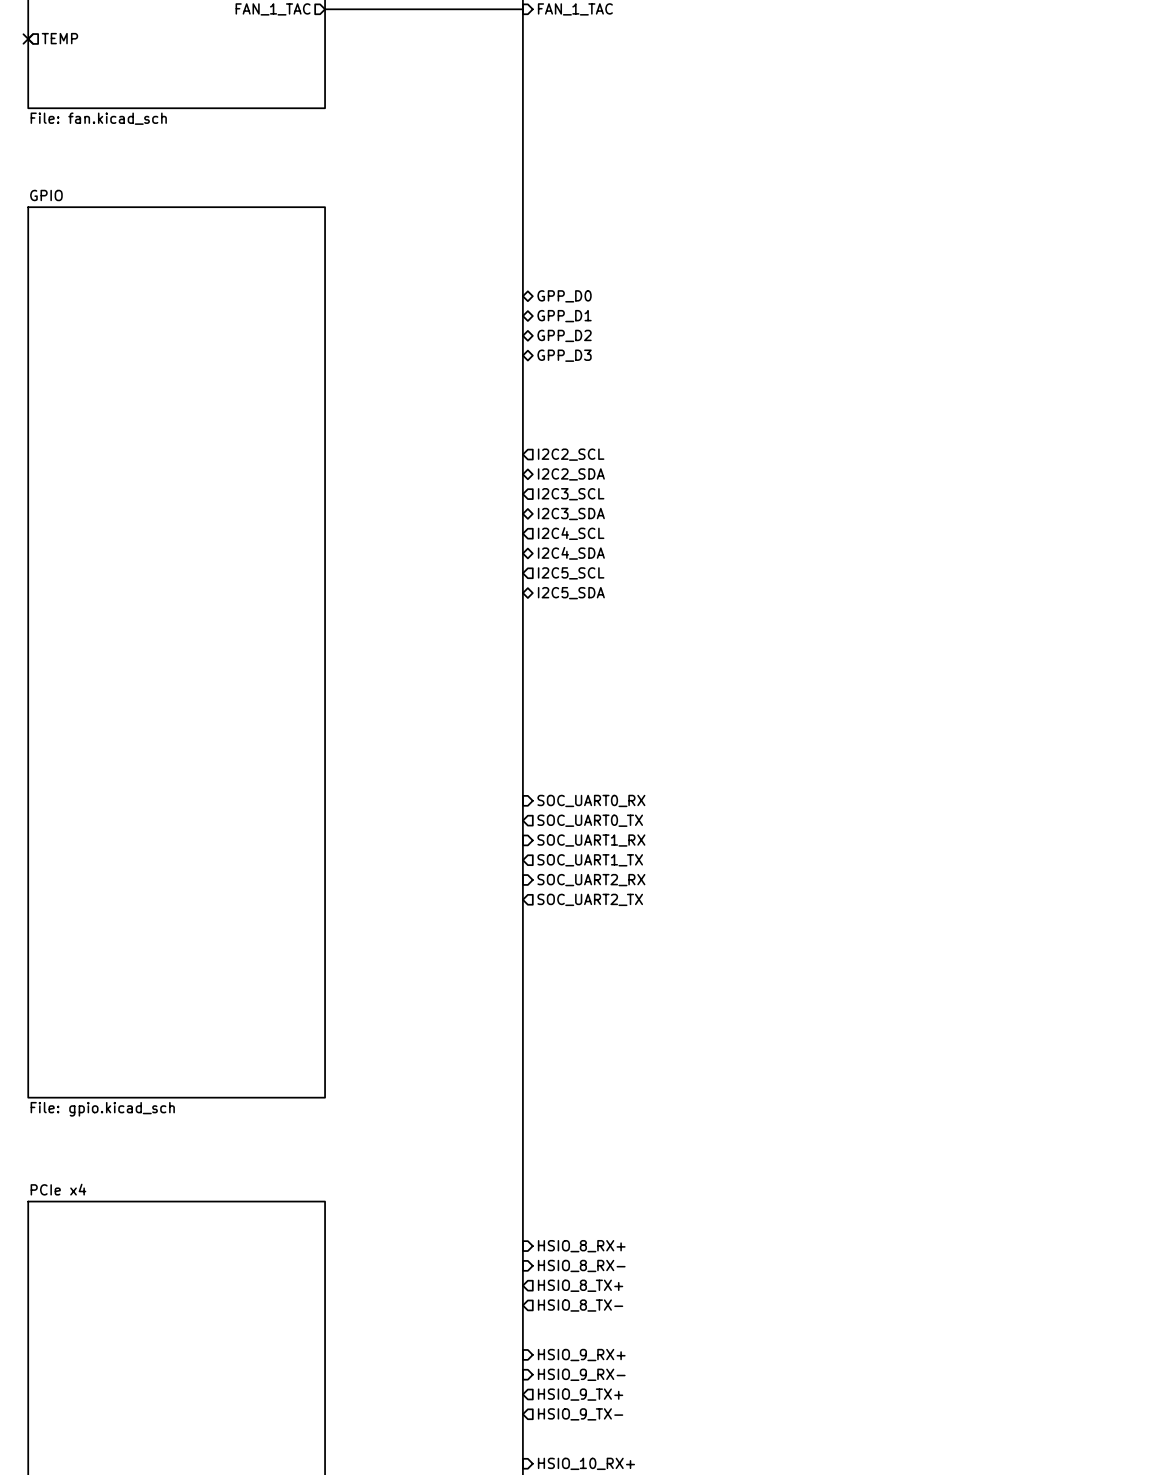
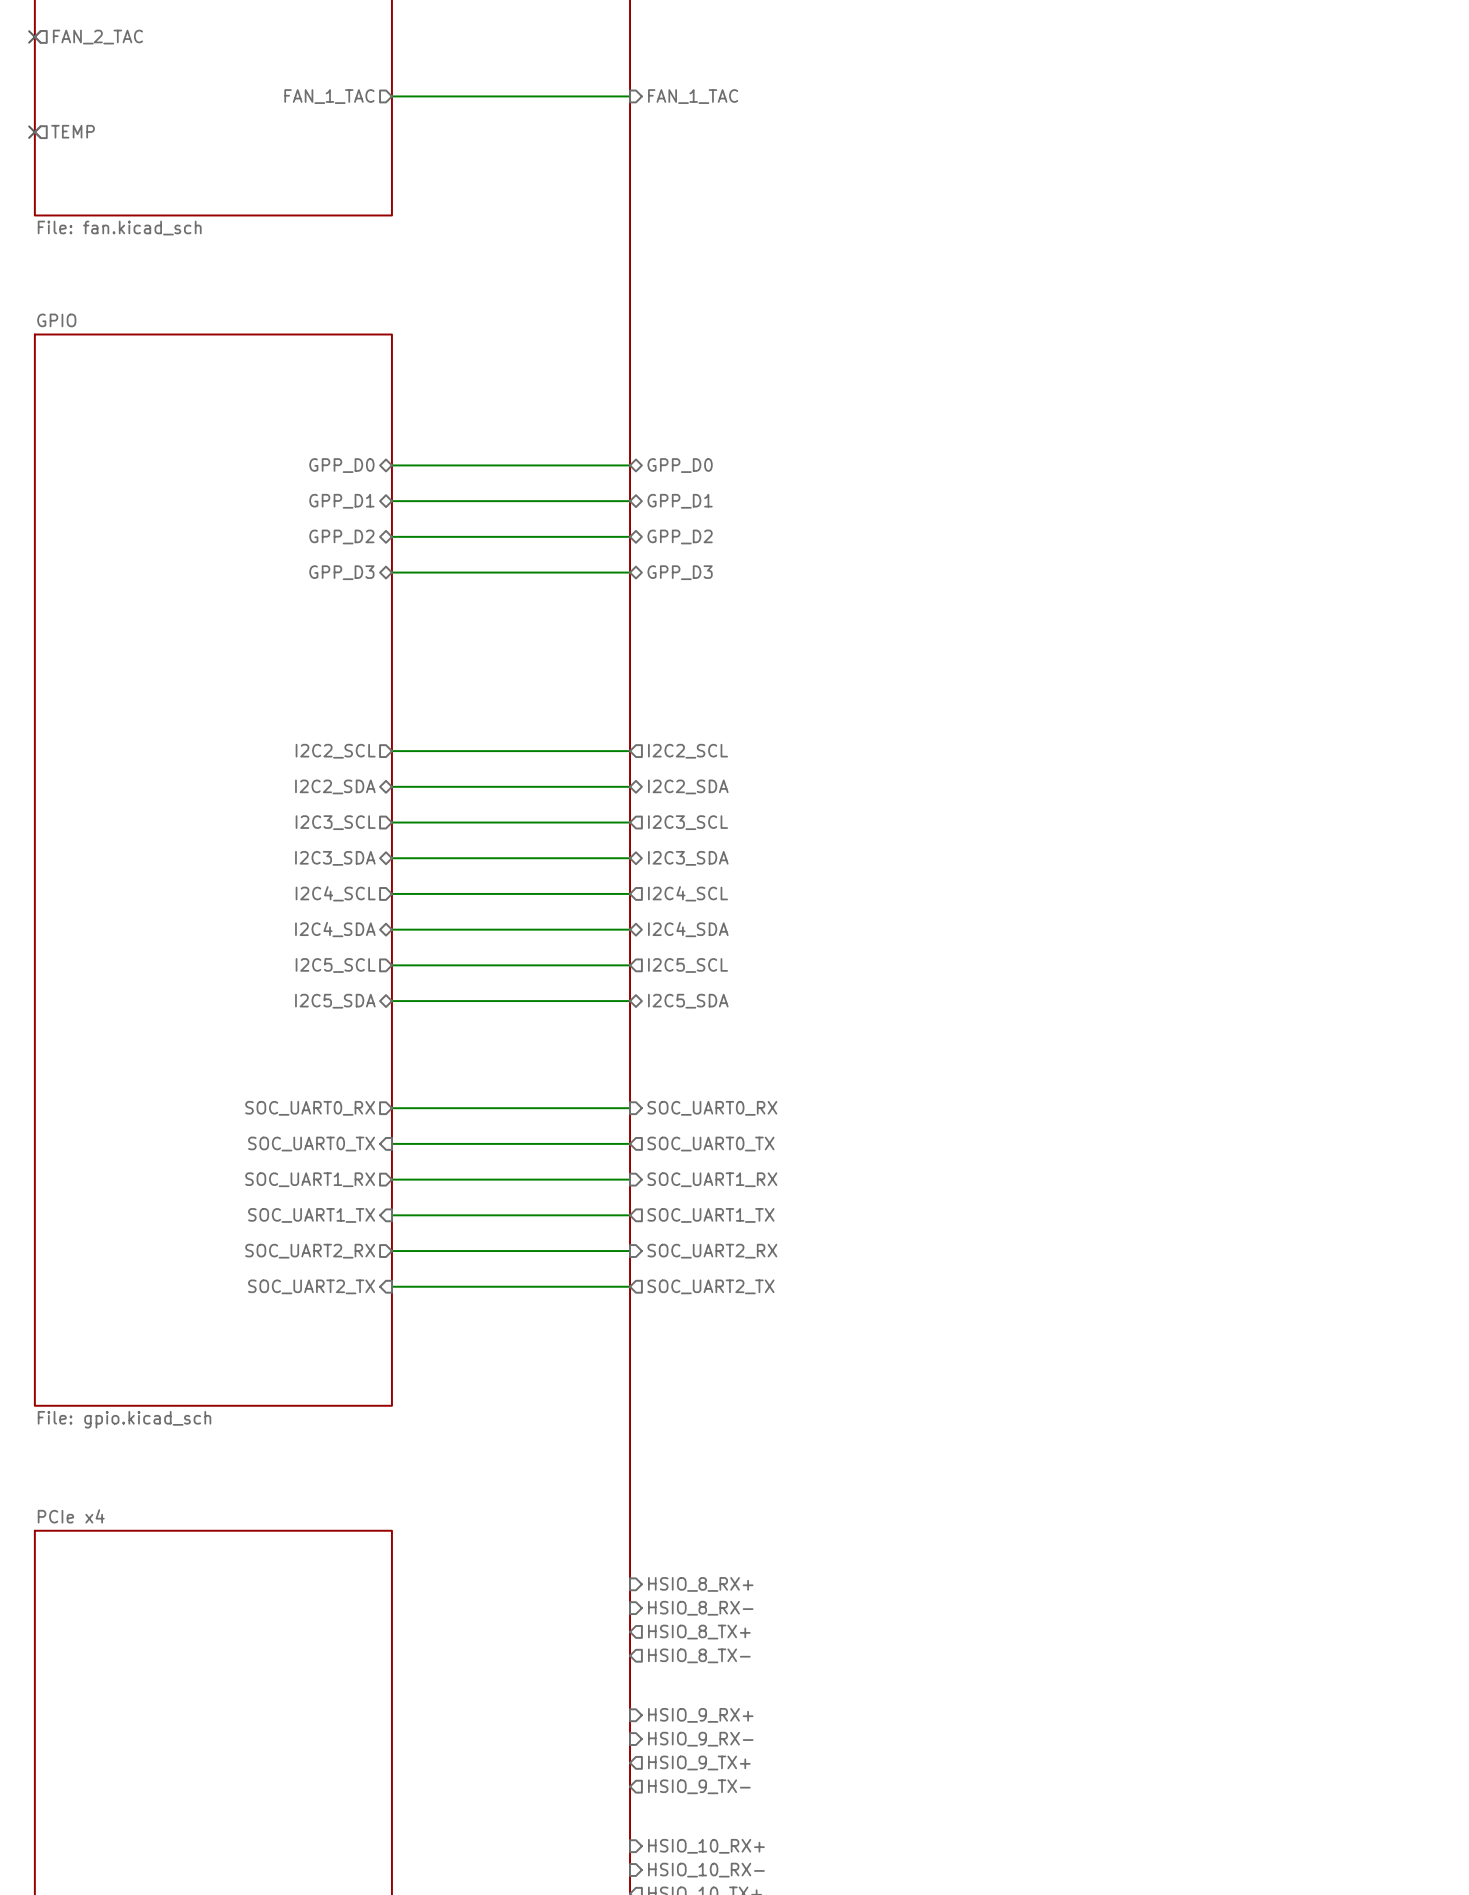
sheet pin: GPP_D0 (564, 296) -> none
sheet pin: none -> GPP_D0 (341, 465)
wire: none -> (391, 465) (630, 465)
sheet pin: GPP_D1 (564, 316) -> GPP_D0 (680, 465)
sheet pin position: GPP_D2 (564, 335) -> GPP_D2 (680, 536)
sheet pin: none -> GPP_D1 (341, 501)
wire: none -> (391, 501) (630, 501)
sheet pin: none -> GPP_D1 (680, 501)
sheet pin position: GPP_D3 (564, 355) -> GPP_D3 (680, 572)
sheet pin: none -> GPP_D2 (341, 536)
wire: none -> (391, 536) (630, 536)
sheet pin: none -> GPP_D3 (341, 572)
wire: none -> (391, 572) (630, 572)
sheet pin: I2C2_SCL (571, 454) -> none
sheet pin position: I2C2_SDA (571, 474) -> I2C2_SDA (688, 786)
sheet pin position: I2C3_SCL (571, 494) -> I2C3_SCL (688, 822)
sheet pin position: I2C3_SDA (571, 514) -> I2C3_SDA (688, 858)
sheet pin: I2C4_SCL (571, 533) -> none
sheet pin: none -> I2C2_SCL (335, 751)
wire: none -> (391, 751) (630, 751)
sheet pin shape: bidirectional (571, 553) -> output (688, 751)
sheet pin: I2C4_SDA (571, 553) -> I2C2_SCL (688, 751)
sheet pin: I2C5_SCL (571, 573) -> none
sheet pin: none -> I2C2_SDA (335, 786)
wire: none -> (391, 786) (630, 786)
sheet pin: I2C5_SDA (571, 593) -> none
sheet pin: none -> I2C3_SCL (335, 822)
wire: none -> (391, 822) (630, 822)
sheet pin: none -> I2C3_SDA (335, 858)
wire: none -> (391, 858) (630, 858)
sheet pin: none -> I2C4_SCL (335, 893)
wire: none -> (391, 893) (630, 893)
sheet pin: none -> I2C4_SCL (688, 893)
sheet pin: none -> I2C4_SDA (335, 929)
wire: none -> (391, 929) (630, 929)
sheet pin: none -> I2C4_SDA (688, 929)
sheet pin: none -> I2C5_SCL (335, 965)
wire: none -> (391, 965) (630, 965)
sheet pin: none -> I2C5_SCL (688, 965)
sheet pin: none -> I2C5_SDA (335, 1001)
wire: none -> (391, 1001) (630, 1001)
sheet pin: none -> I2C5_SDA (688, 1001)
sheet pin position: SOC_UART0_RX (591, 800) -> SOC_UART0_RX (712, 1108)
sheet pin: SOC_UART0_TX (590, 820) -> none
sheet pin position: SOC_UART1_RX (591, 840) -> SOC_UART1_RX (712, 1179)
sheet pin: none -> SOC_UART0_RX (310, 1108)
wire: none -> (391, 1108) (630, 1108)
sheet pin position: SOC_UART1_TX (590, 860) -> SOC_UART1_TX (710, 1215)
wire: none -> (391, 1143) (630, 1143)
sheet pin: none -> SOC_UART0_TX (311, 1144)
sheet pin shape: input (591, 880) -> output (710, 1144)
sheet pin: SOC_UART2_RX (591, 880) -> SOC_UART0_TX (710, 1144)
sheet pin position: SOC_UART2_TX (590, 899) -> SOC_UART2_TX (710, 1286)
sheet pin: none -> SOC_UART1_RX (310, 1179)
wire: none -> (391, 1179) (630, 1179)
sheet pin: none -> SOC_UART1_TX (311, 1215)
wire: none -> (391, 1215) (630, 1215)
sheet pin: none -> SOC_UART2_RX (310, 1251)
wire: none -> (391, 1251) (630, 1251)
sheet pin: none -> SOC_UART2_RX (712, 1251)
sheet pin: none -> SOC_UART2_TX (311, 1286)
wire: none -> (391, 1286) (630, 1286)

